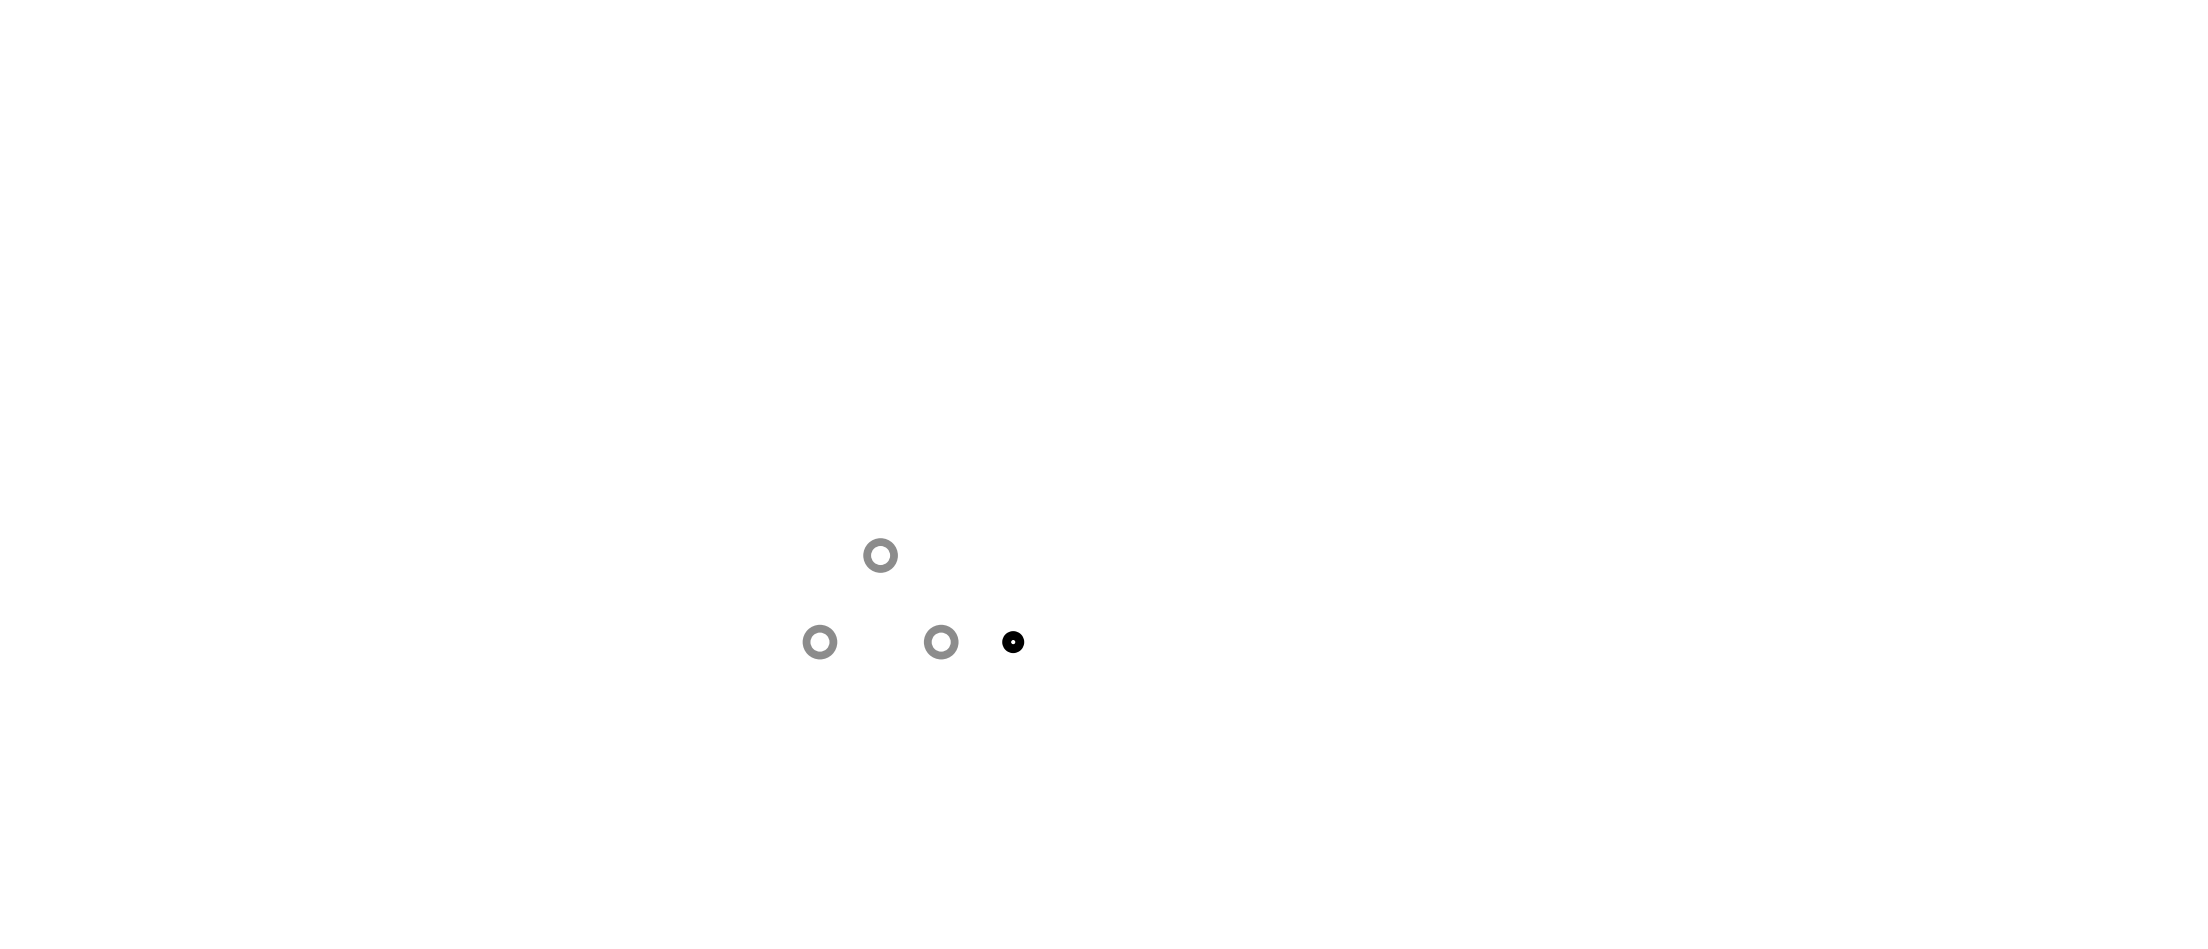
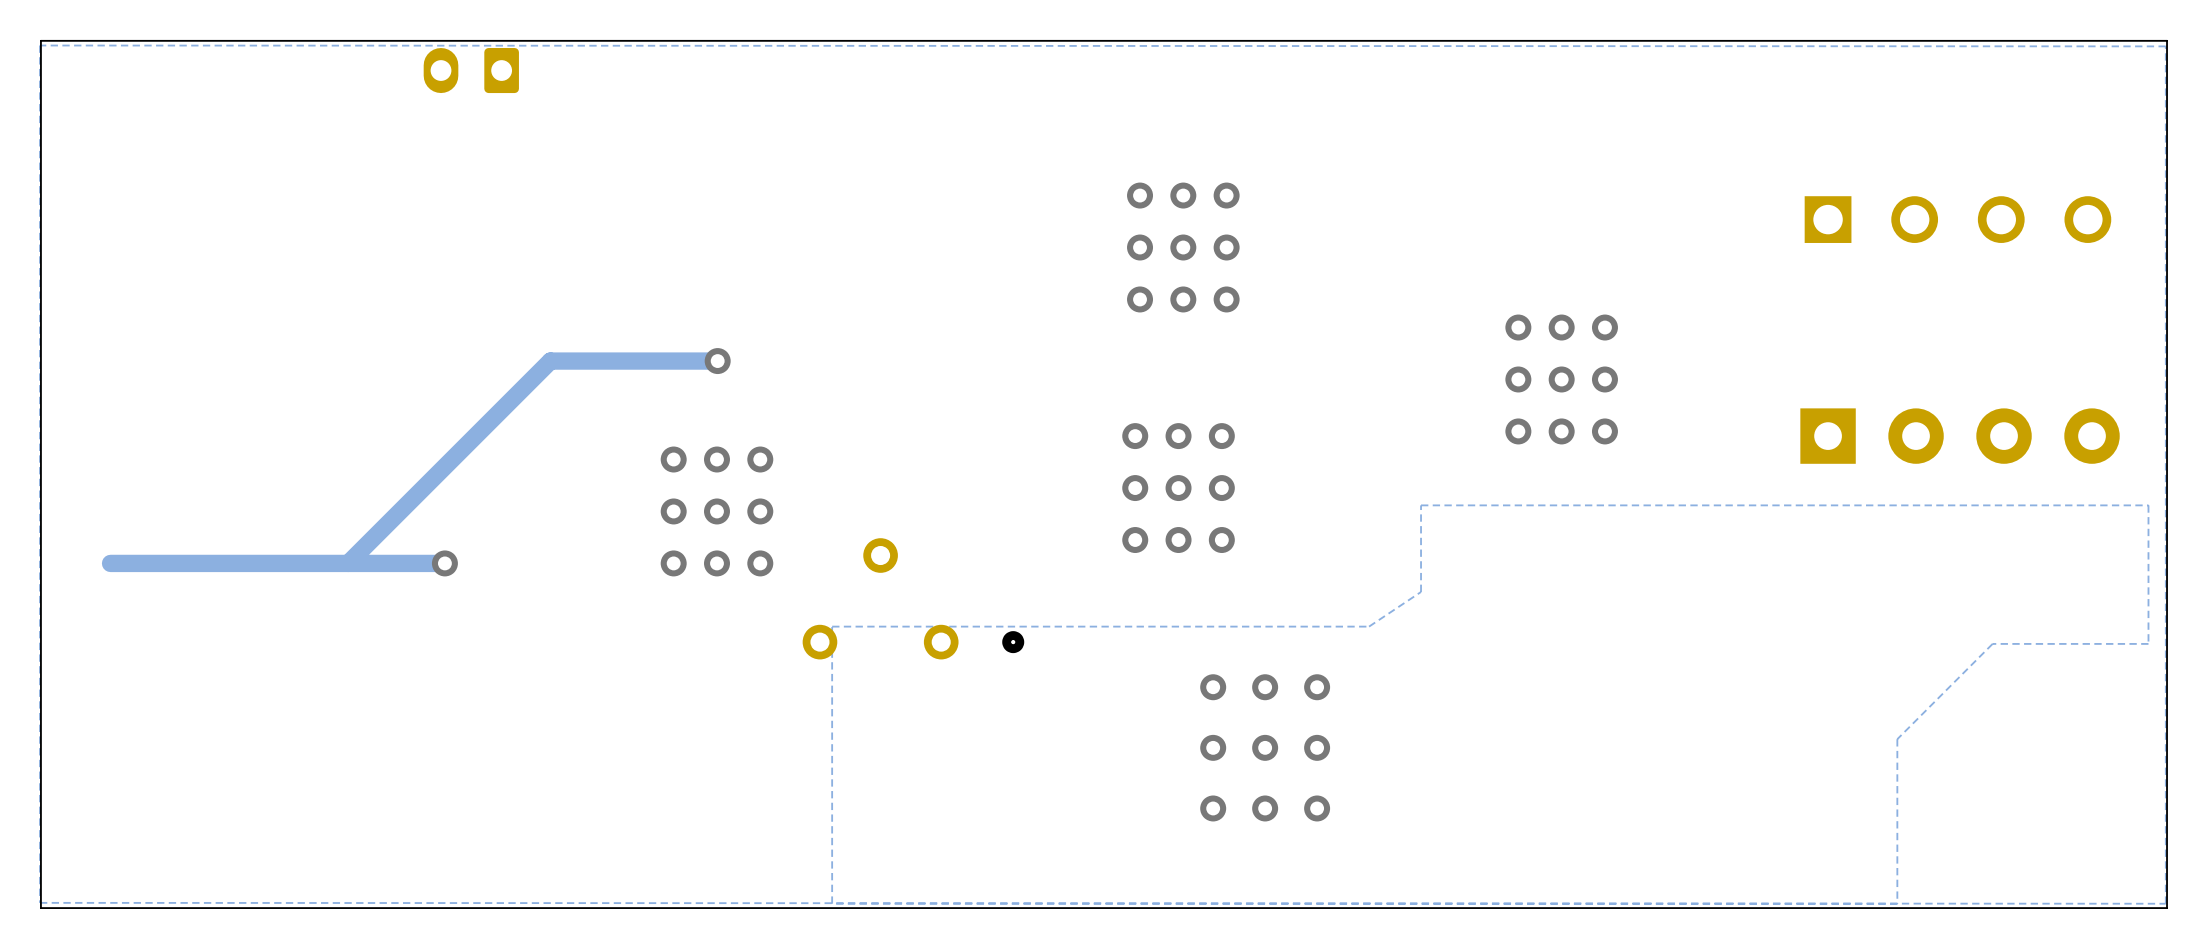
board edge: none -> (2167, 40) (40, 40) (40, 908) (2167, 908) (2167, 40)
zone outline: none -> (39, 45) (2165, 46) (2165, 903) (39, 902) (39, 45)
part: none -> (471, 70)
via: none -> (1140, 195)
via: none -> (1183, 195)
via: none -> (1226, 195)
part: none -> (1957, 219)
via: none -> (1140, 247)
via: none -> (1183, 247)
via: none -> (1226, 247)
via: none -> (1140, 299)
via: none -> (1183, 299)
via: none -> (1226, 299)
via: none -> (1518, 327)
via: none -> (1561, 327)
via: none -> (1604, 327)
track: none -> (717, 361) (550, 361) (348, 563)
via: none -> (717, 361)
via: none -> (1518, 379)
via: none -> (1561, 379)
via: none -> (1604, 379)
via: none -> (1518, 431)
via: none -> (1561, 431)
via: none -> (1604, 431)
via: none -> (1135, 436)
via: none -> (1178, 436)
via: none -> (1221, 436)
part: none -> (1960, 436)
via: none -> (673, 459)
via: none -> (716, 459)
via: none -> (760, 459)
via: none -> (1135, 488)
via: none -> (1178, 488)
via: none -> (1221, 488)
zone outline: none -> (2148, 505) (1421, 505) (1421, 591) (1369, 626) (832, 626) (832, 903) (1897, 903) (1897, 739) (1992, 643) (2148, 643) (2148, 505)
via: none -> (673, 511)
via: none -> (716, 511)
via: none -> (760, 511)
via: none -> (1135, 540)
via: none -> (1178, 540)
via: none -> (1221, 540)
track: none -> (444, 563) (110, 563)
via: none -> (444, 563)
via: none -> (673, 563)
via: none -> (716, 563)
via: none -> (760, 563)
via: none -> (1213, 687)
via: none -> (1265, 687)
via: none -> (1317, 687)
via: none -> (1213, 747)
via: none -> (1265, 747)
via: none -> (1317, 747)
via: none -> (1213, 808)
via: none -> (1265, 808)
via: none -> (1317, 808)

